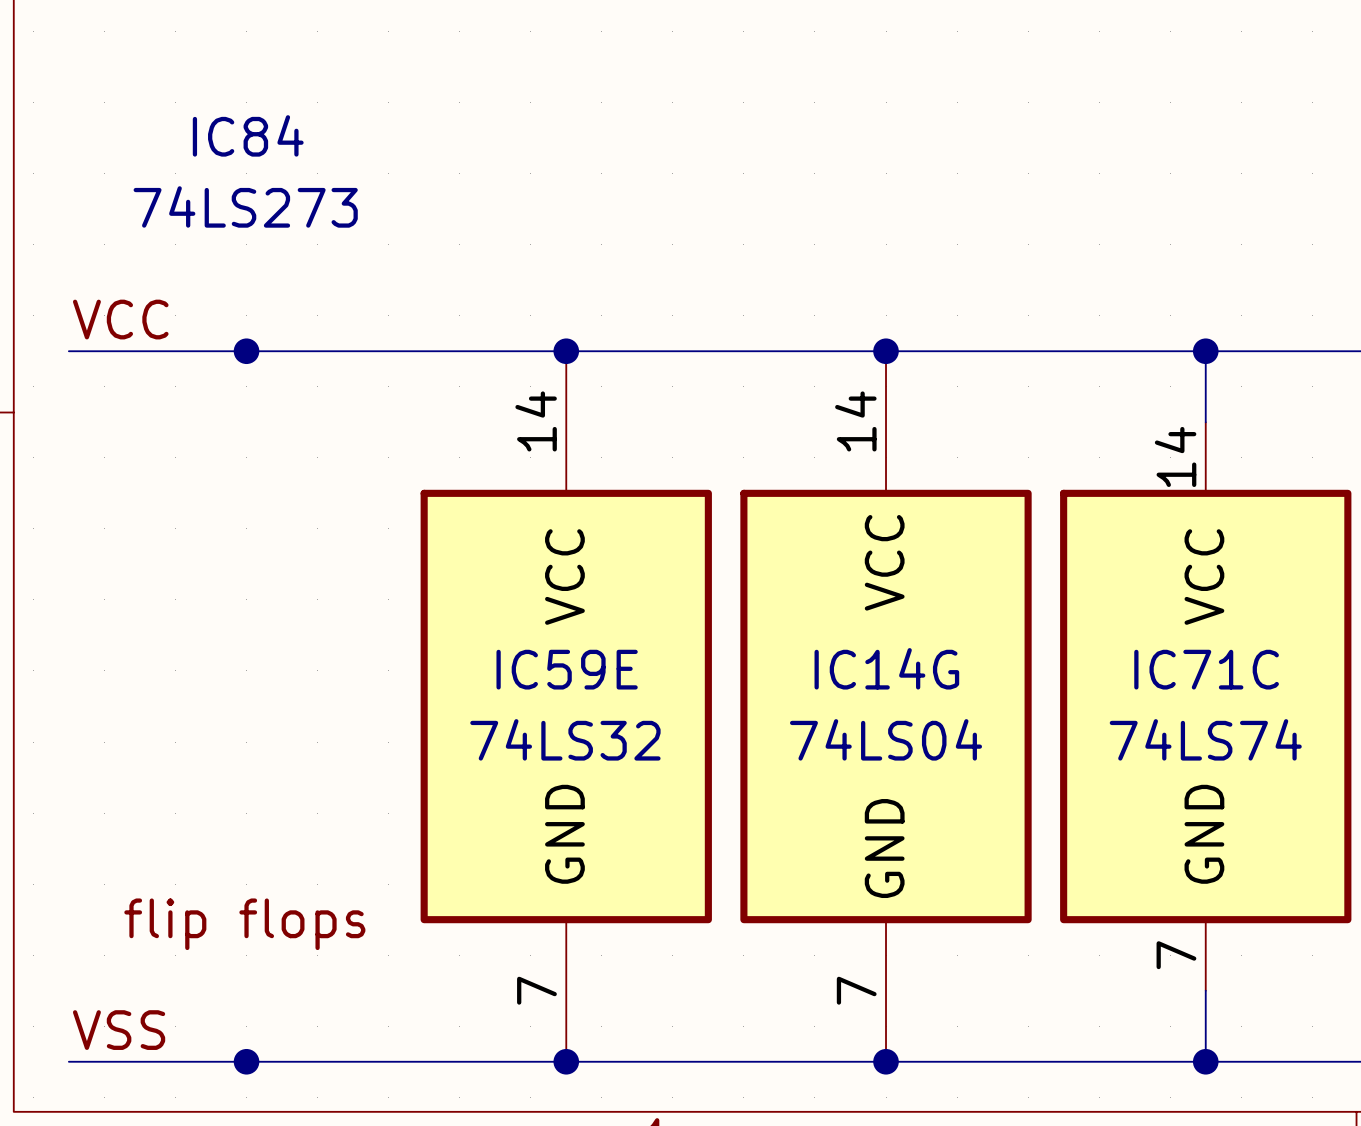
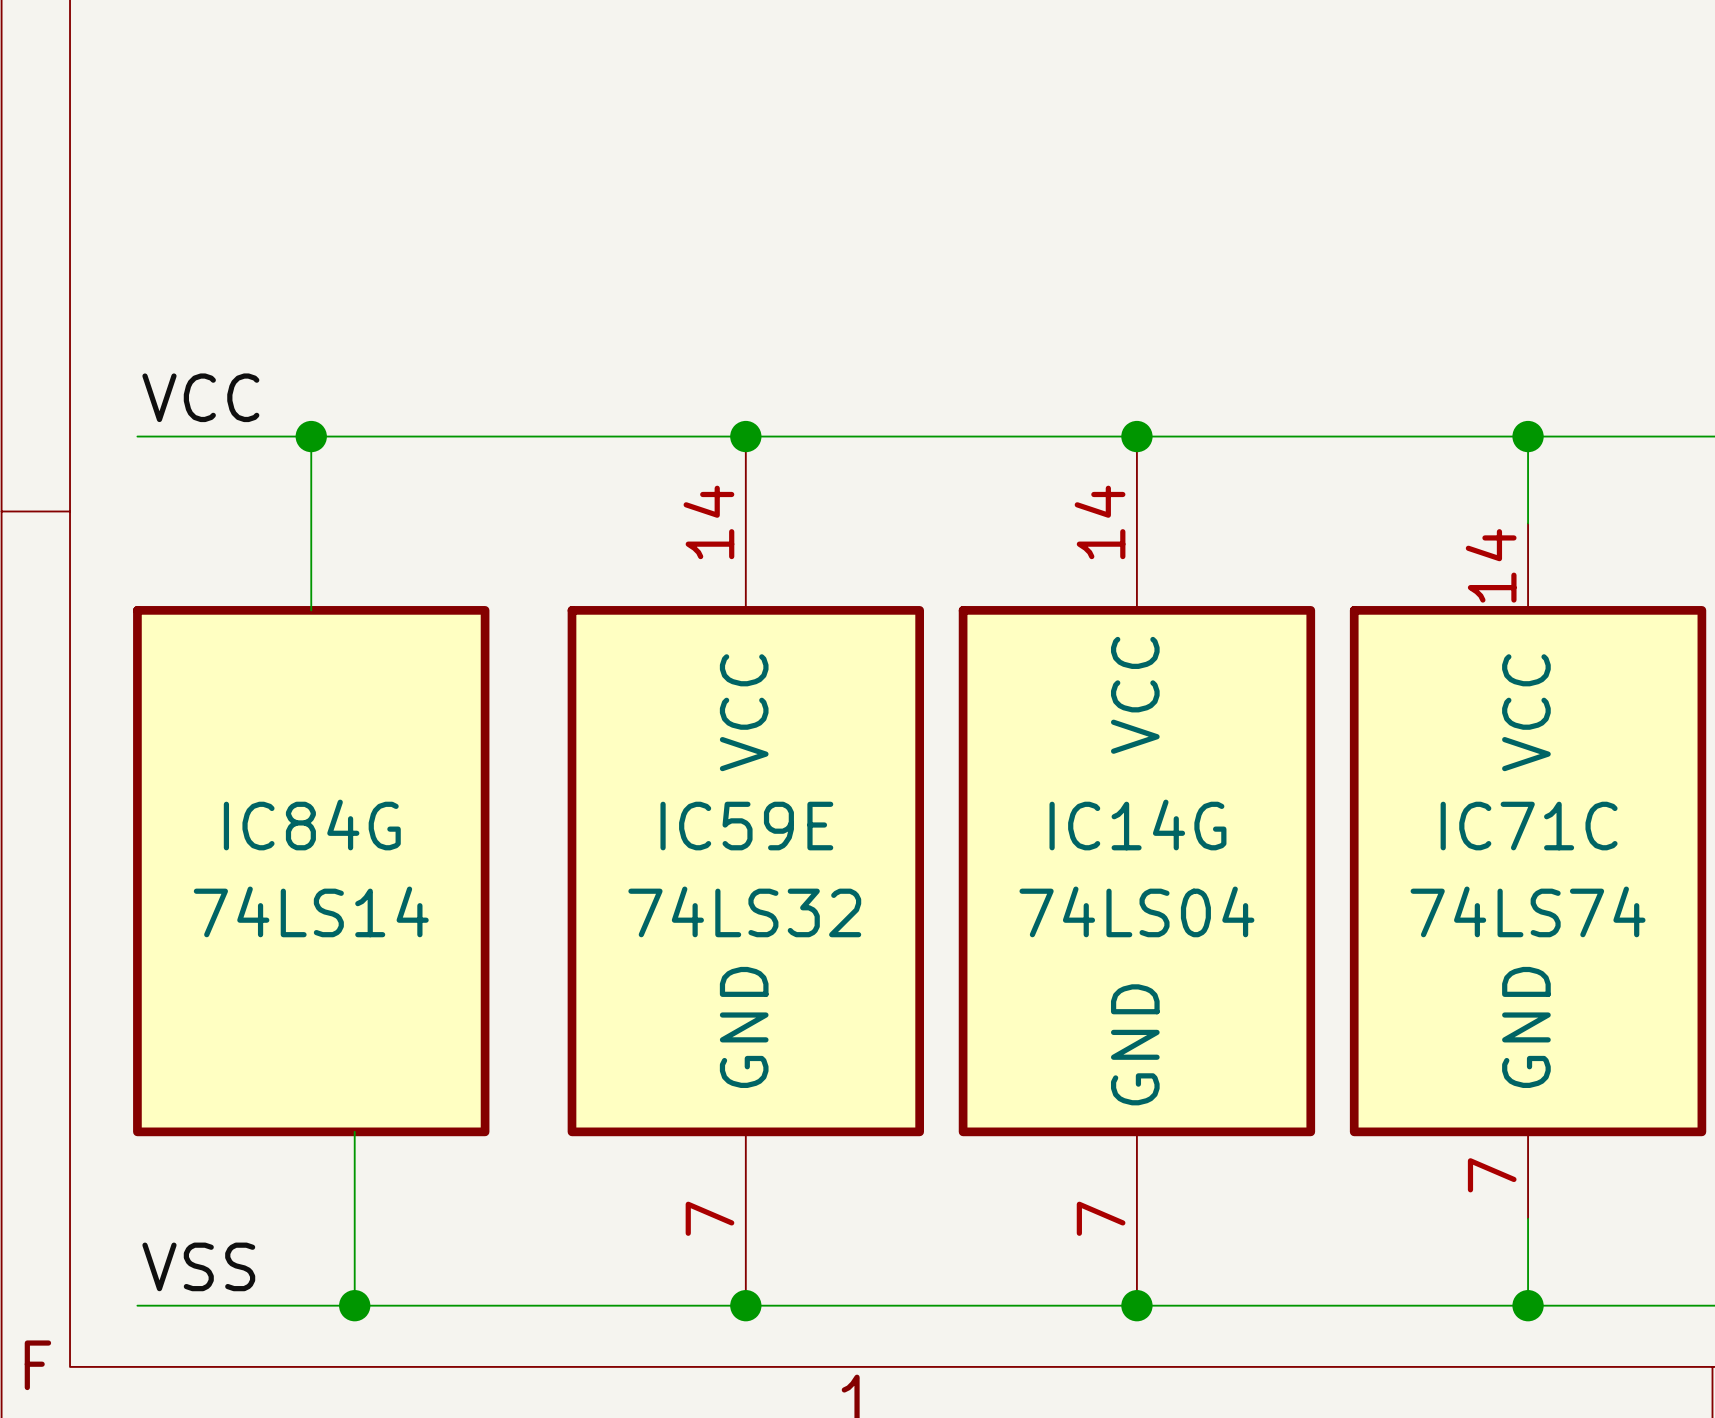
wire: none -> (311, 436) (311, 610)
junction position: (246, 351) -> (311, 436)
IC84: 74LS273 (244, 532) -> none
IC84G: none -> 74LS14 (311, 871)
wire: none -> (354, 1131) (354, 1305)

